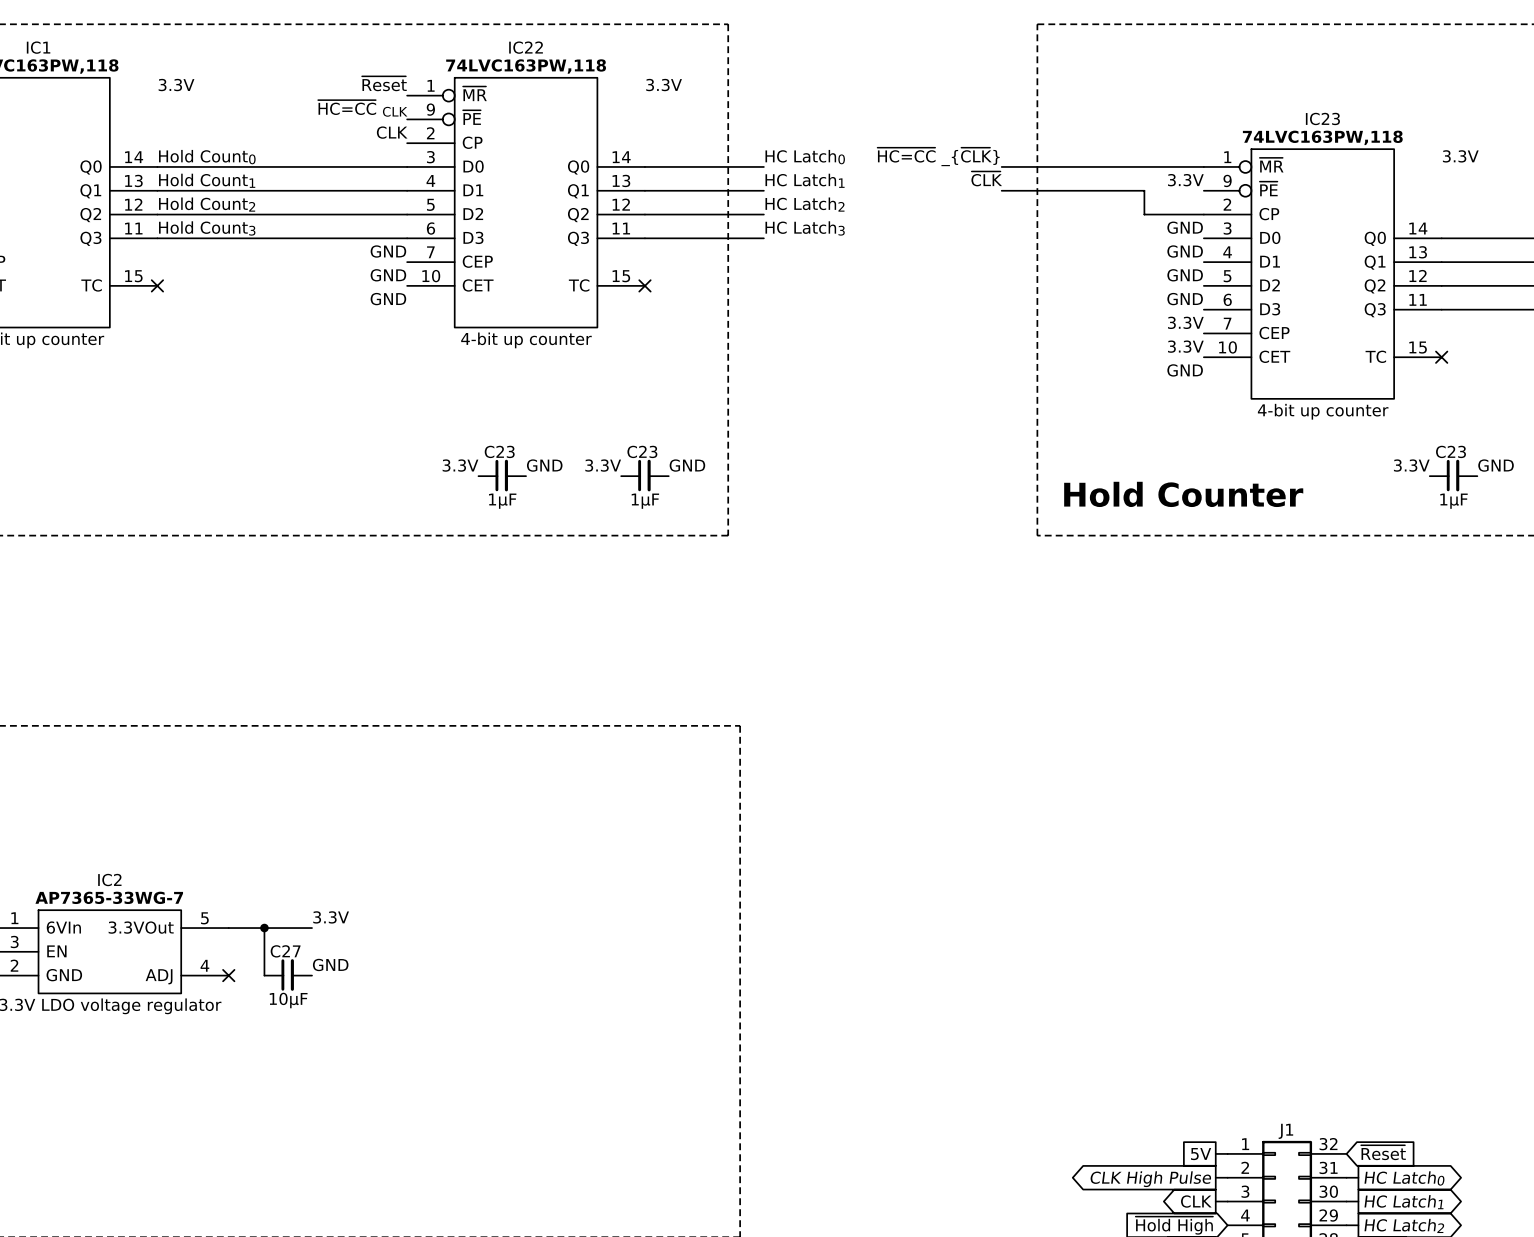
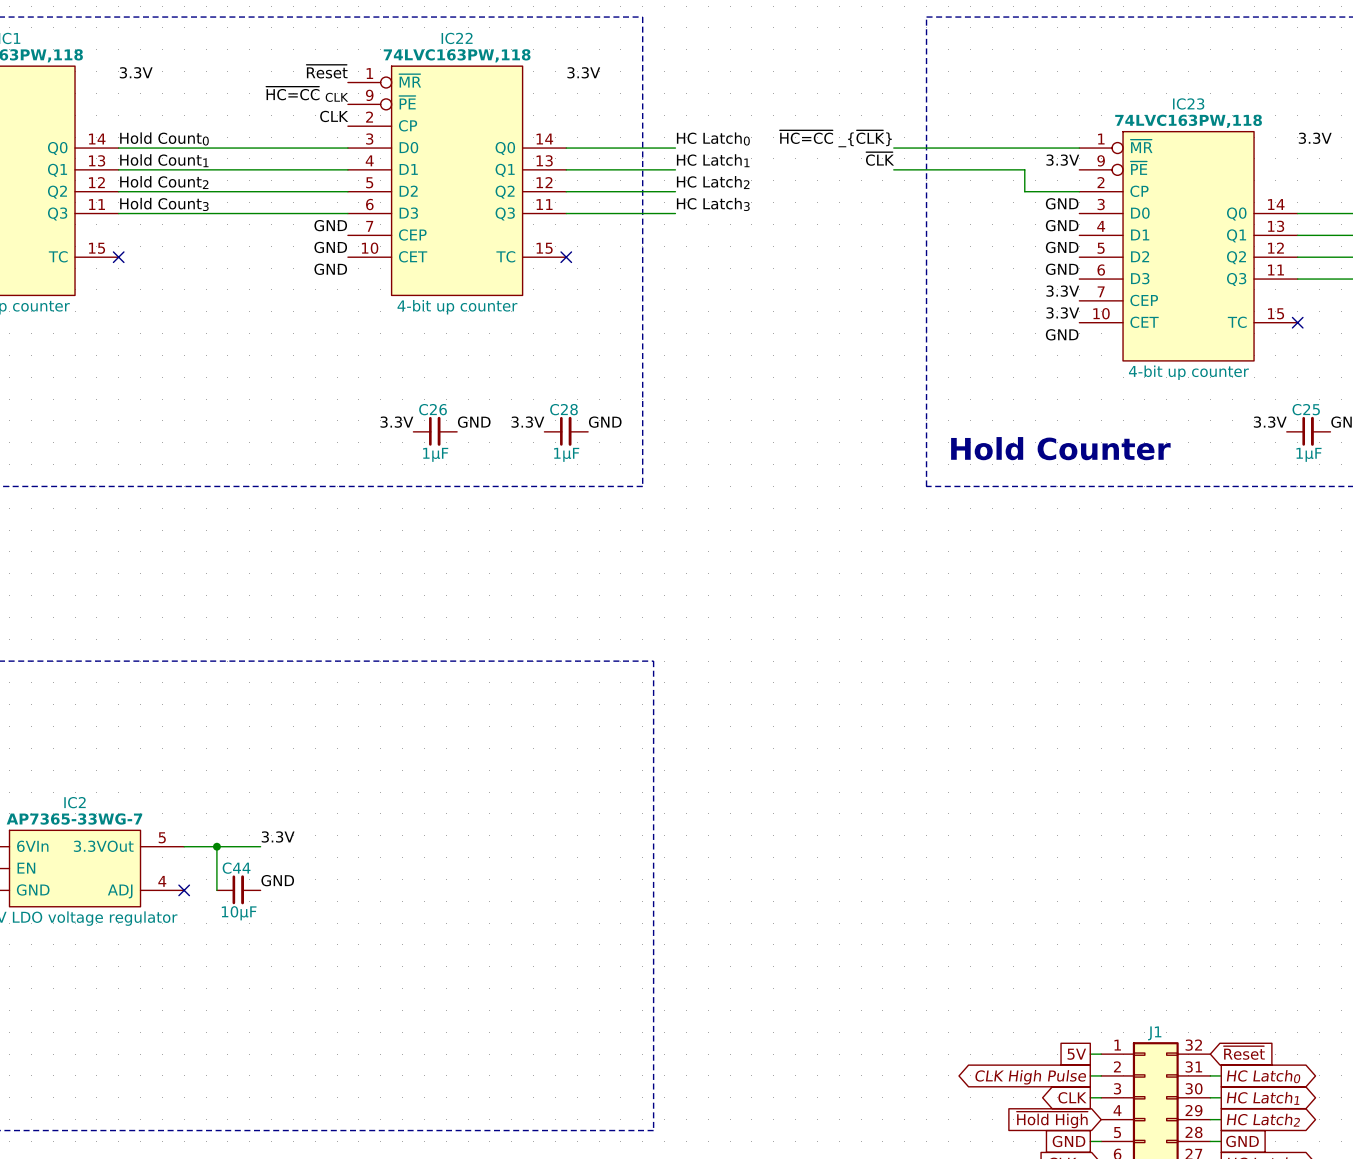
C23 name: C23 (499, 451) -> C26 (433, 409)
C23 name: C23 (642, 451) -> C28 (563, 409)
C23 name: C23 (1450, 451) -> C25 (1306, 409)
C27 name: C27 (285, 951) -> C44 (236, 868)

